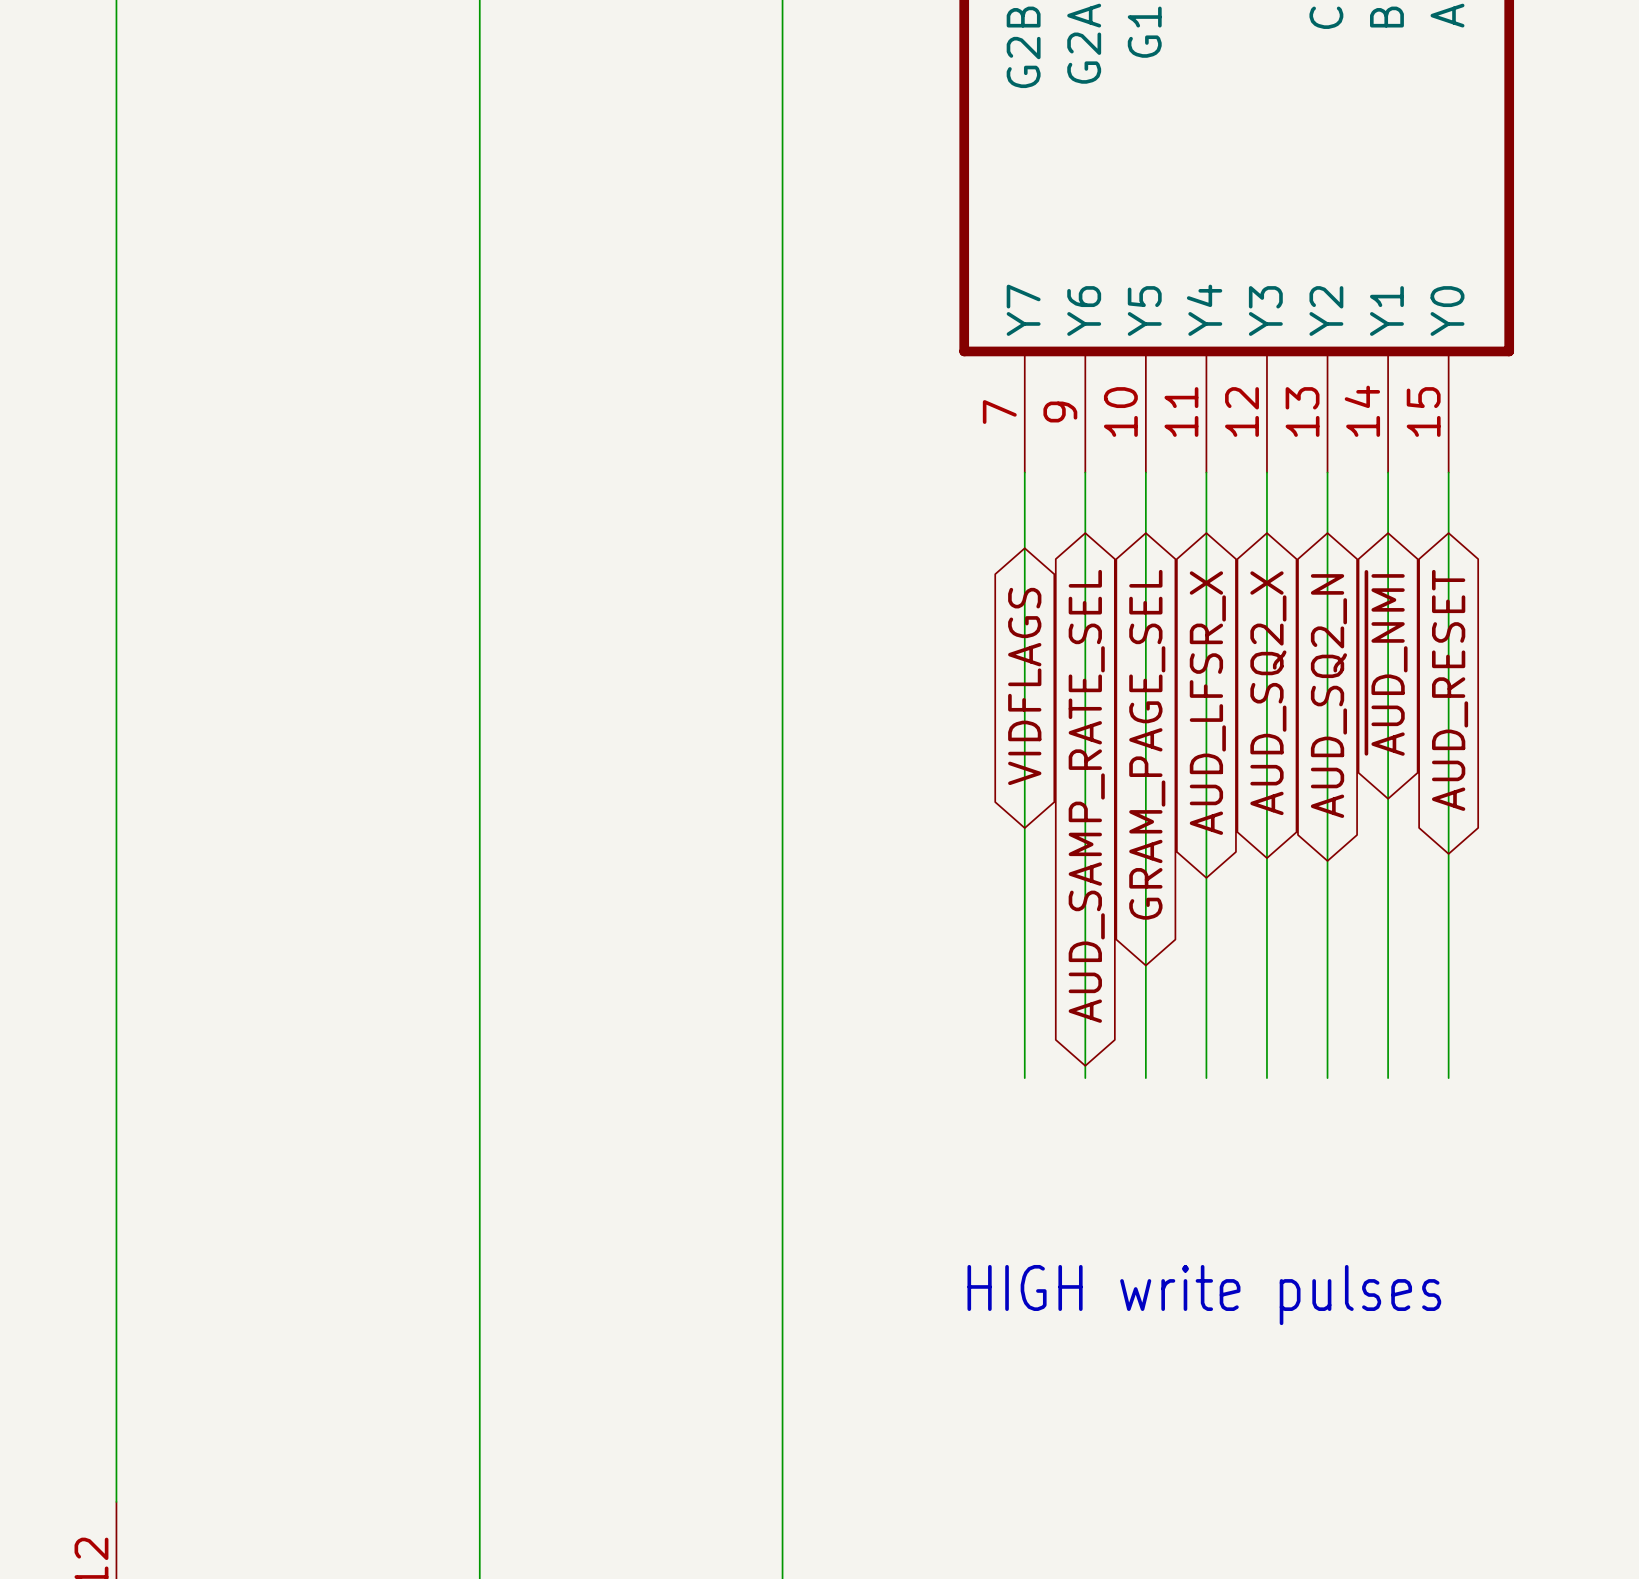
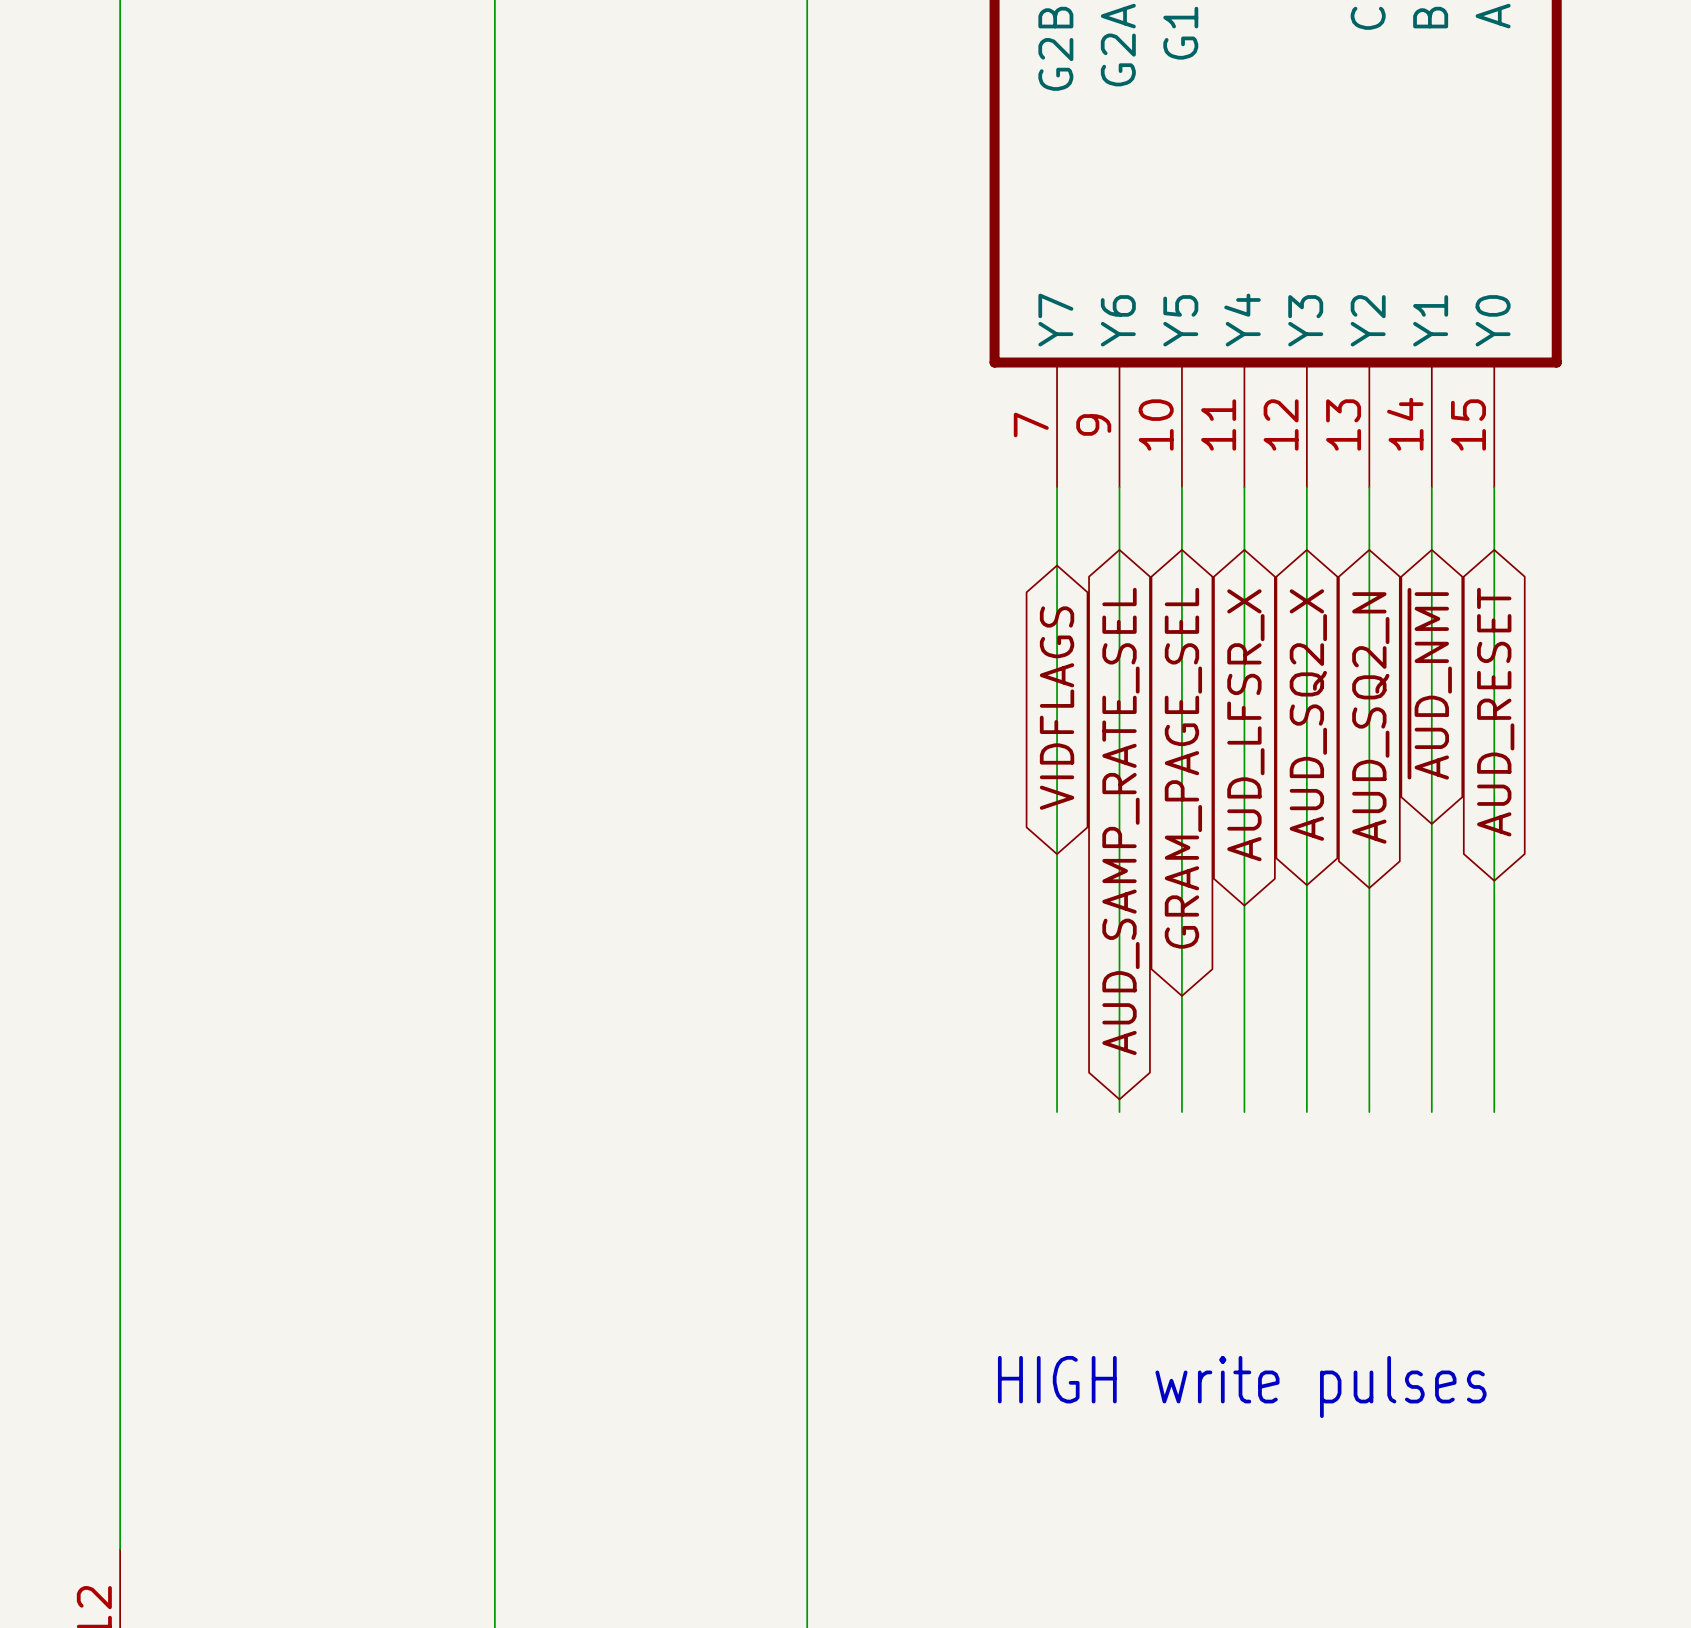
text position: HIGH write pulses (1204, 1295) -> HIGH write pulses (1242, 1386)

